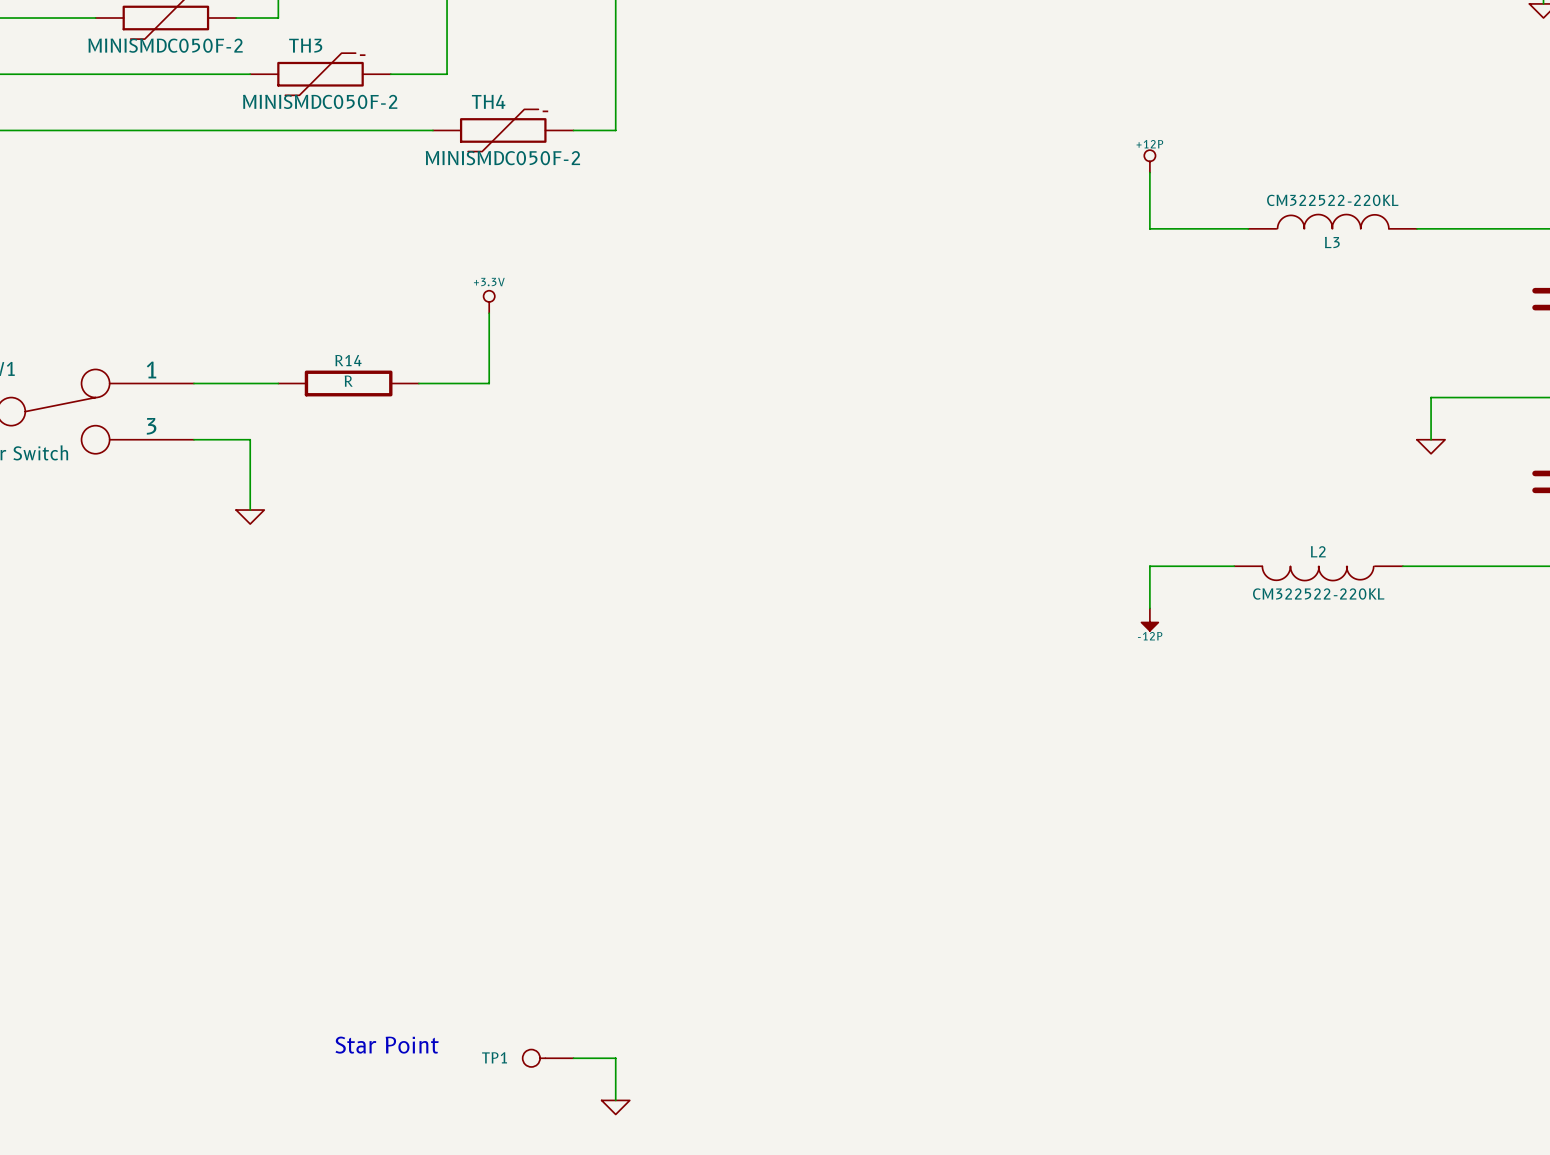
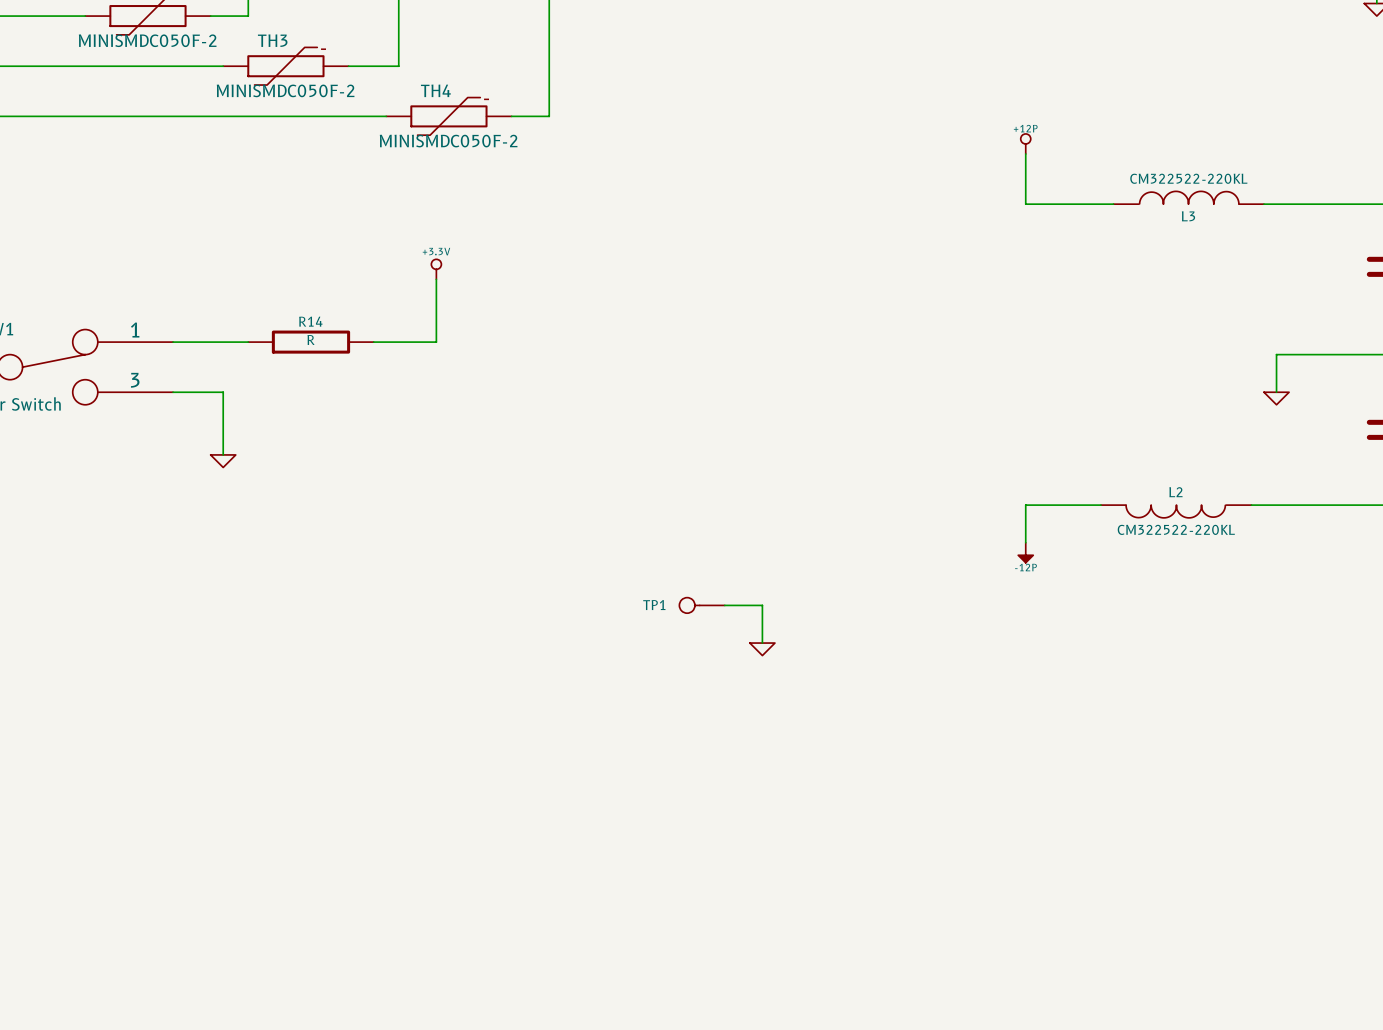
wire: none -> (724, 605) (762, 605) (762, 643)
power symbol: none -> (762, 649)
text: Star Point (387, 1045) -> none
TP1 position: (548, 1058) -> (702, 605)
wire: (573, 1058) (615, 1058) (615, 1100) -> none
power symbol: (615, 1107) -> none

